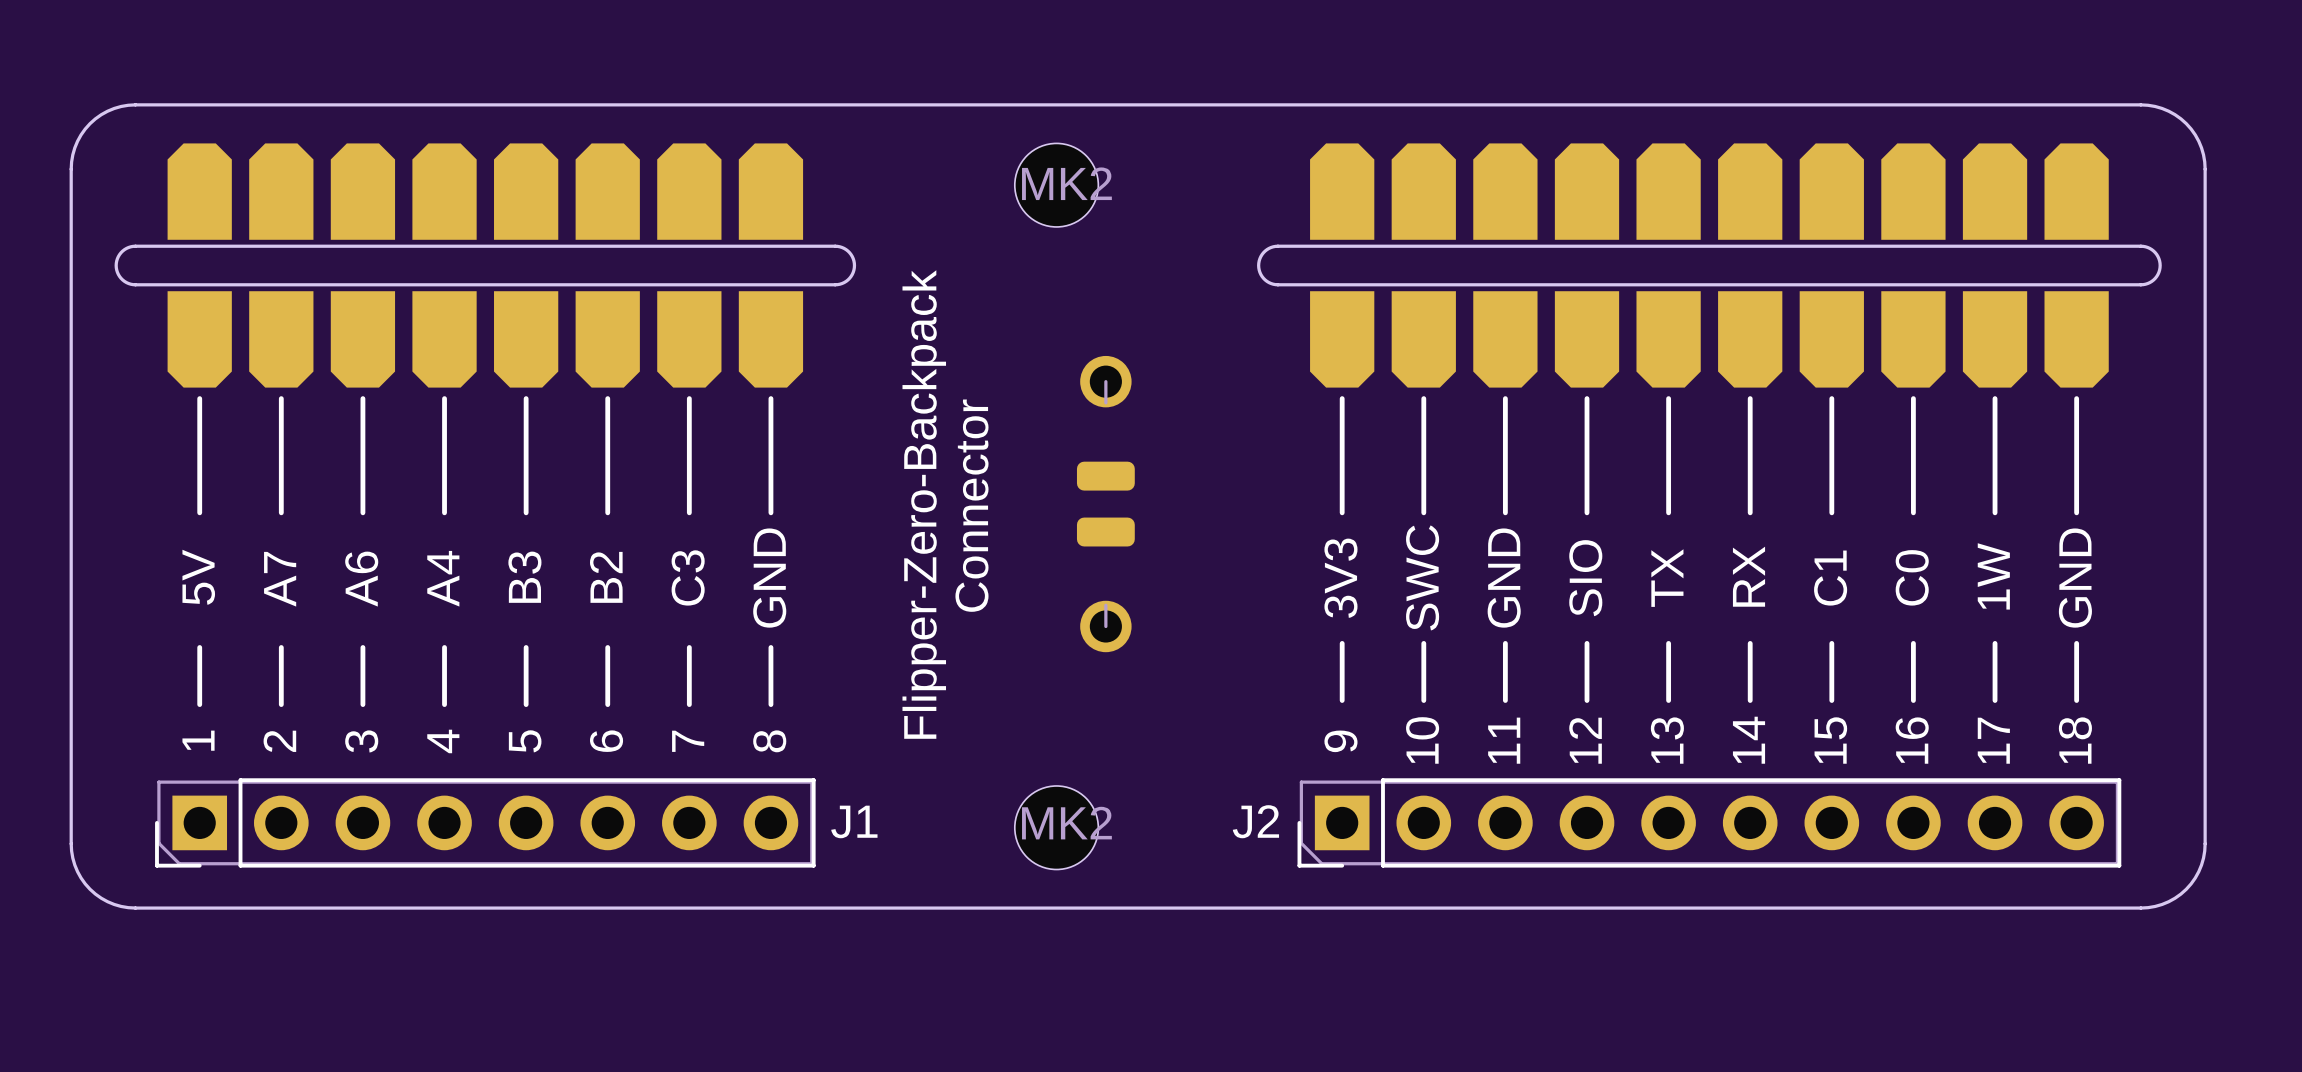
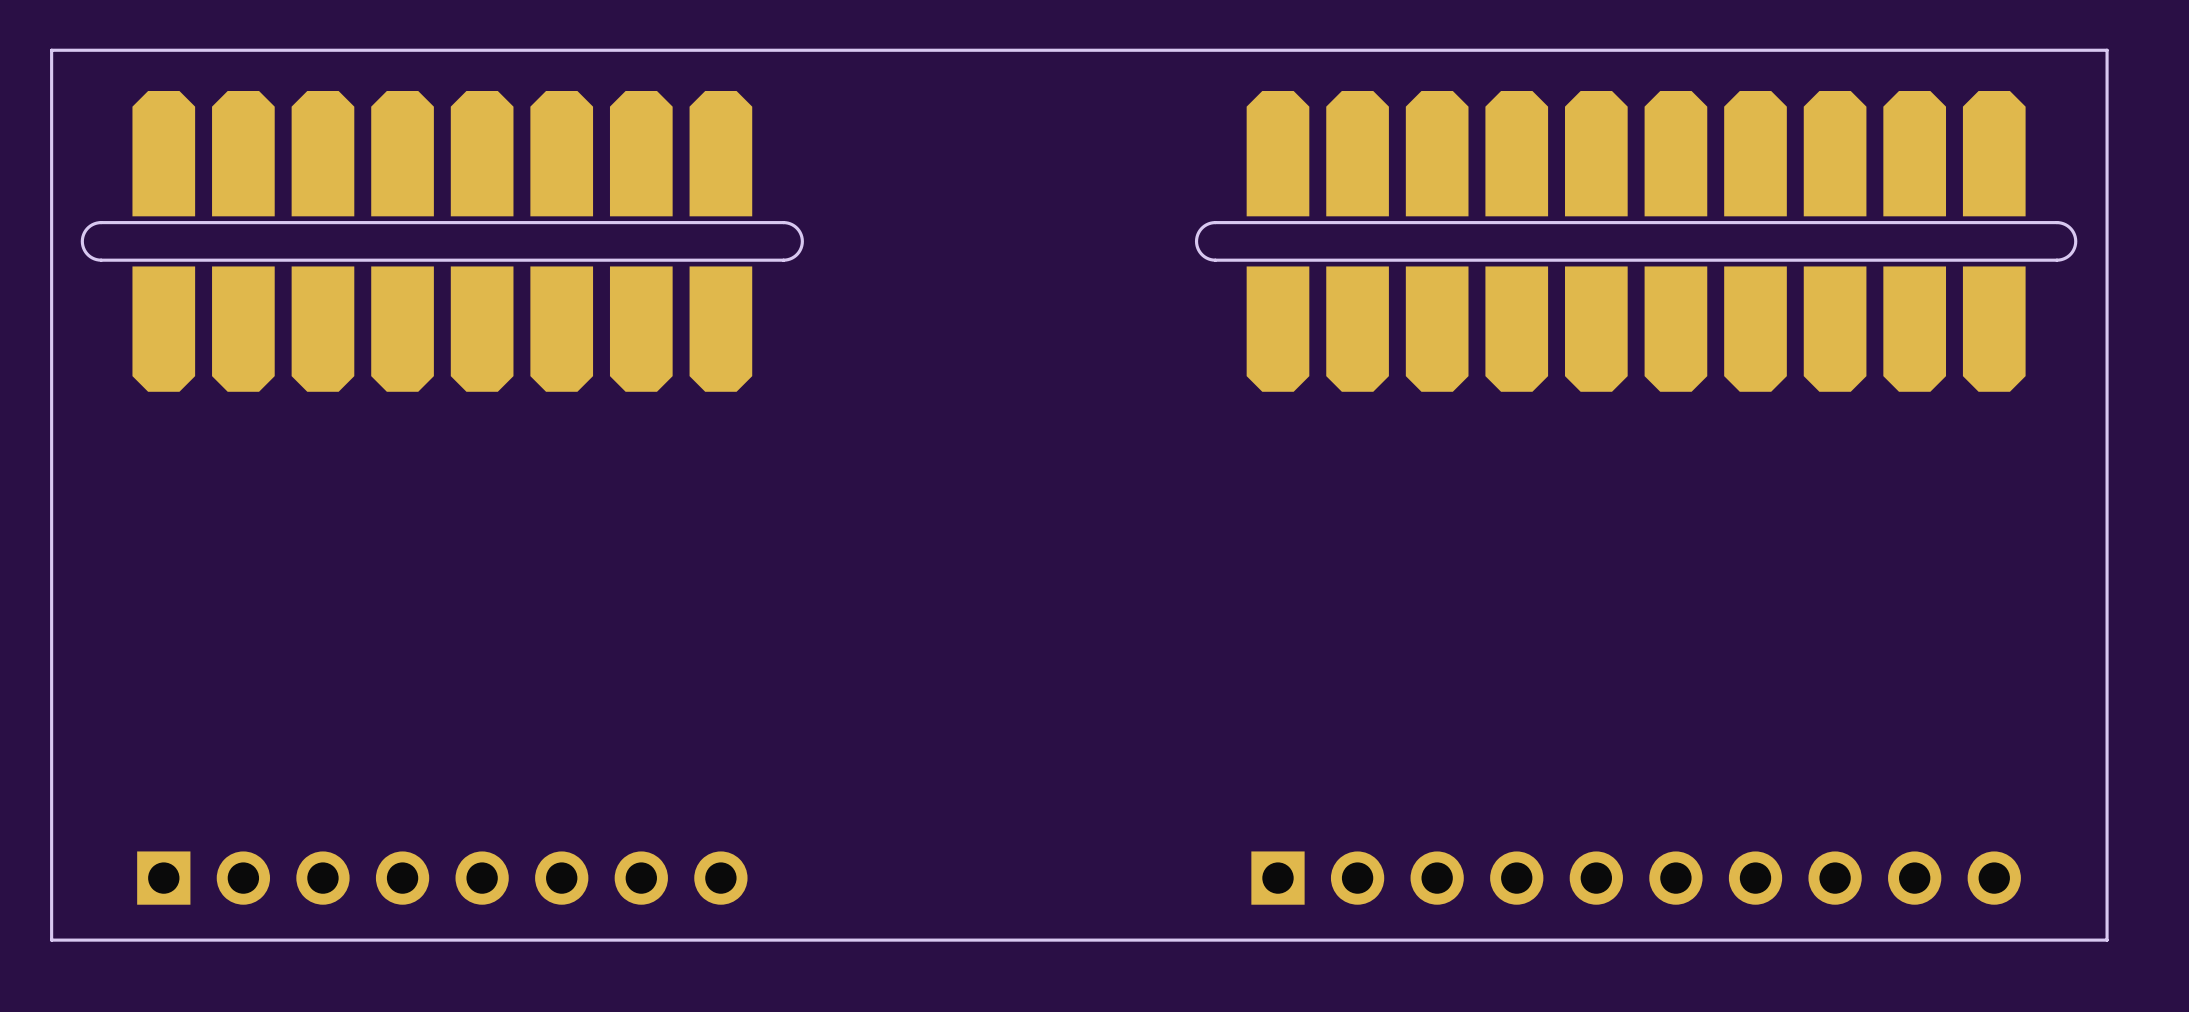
board edge: (135, 104) (2140, 104) (2162, 108) (2180, 118) (2191, 129) (2201, 147) (2205, 169) (2205, 843) (2201, 865) (2191, 883) (2180, 894) (2162, 904) (2140, 908) (135, 908) (114, 904) (95, 894) (85, 883) (74, 865) (71, 851) (71, 169) (74, 147) (81, 134) (90, 123) (101, 114) (114, 108) (135, 104) -> (51, 50) (51, 940) (2107, 940) (2107, 50) (51, 50)
part footprint: [167, 143, 232, 388] -> [132, 90, 196, 392]
part footprint: [249, 143, 314, 388] -> [212, 90, 275, 392]
part footprint: [330, 143, 396, 388] -> [291, 90, 355, 392]
part footprint: [412, 143, 477, 388] -> [371, 90, 434, 392]
part footprint: [494, 143, 559, 388] -> [450, 90, 514, 392]
part footprint: [575, 143, 640, 388] -> [530, 90, 594, 392]
part footprint: [657, 143, 722, 388] -> [609, 90, 673, 392]
part footprint: [738, 143, 804, 388] -> [689, 90, 753, 392]
part footprint: [1310, 143, 1375, 388] -> [1246, 90, 1310, 392]
part footprint: [1391, 143, 1456, 388] -> [1326, 90, 1389, 392]
part footprint: [1473, 143, 1538, 388] -> [1405, 90, 1469, 392]
part footprint: [1554, 143, 1620, 388] -> [1485, 90, 1549, 392]
part footprint: [1636, 143, 1701, 388] -> [1565, 90, 1628, 392]
part footprint: [1718, 143, 1783, 388] -> [1644, 90, 1708, 392]
part footprint: [1799, 143, 1864, 388] -> [1724, 90, 1787, 392]
part footprint: [1881, 143, 1946, 388] -> [1803, 90, 1867, 392]
part footprint: [1962, 143, 2028, 388] -> [1883, 90, 1947, 392]
part footprint: [2044, 143, 2109, 388] -> [1962, 90, 2026, 392]
MK2: (1056, 185) -> none
line: (199, 398) (199, 512) -> none
line: (281, 398) (281, 512) -> none
line: (362, 398) (362, 512) -> none
line: (444, 398) (444, 512) -> none
line: (526, 398) (526, 512) -> none
line: (607, 398) (607, 512) -> none
line: (689, 398) (689, 512) -> none
line: (770, 398) (770, 512) -> none
line: (1342, 398) (1342, 512) -> none
line: (1423, 398) (1423, 512) -> none
line: (1505, 398) (1505, 512) -> none
line: (1587, 398) (1587, 512) -> none
line: (1668, 398) (1668, 512) -> none
line: (1750, 398) (1750, 512) -> none
line: (1831, 398) (1831, 512) -> none
line: (1913, 398) (1913, 512) -> none
line: (1995, 398) (1995, 512) -> none
line: (2076, 398) (2076, 512) -> none
text: Flipper-Zero-Backpack (924, 504) -> none
part: (1105, 504) -> none
text: Connector (971, 505) -> none
text: RX (1749, 576) -> none
text: 1W (1993, 576) -> none
text: 5V (198, 577) -> none
text: B3 (524, 577) -> none
text: B2 (606, 577) -> none
text: C3 (688, 577) -> none
text: SWC (1422, 577) -> none
text: C0 (1912, 577) -> none
text: A4 (443, 578) -> none
text: GND (769, 578) -> none
text: 3V3 (1340, 578) -> none
text: GND (1504, 578) -> none
text: SIO (1585, 578) -> none
text: TX (1667, 578) -> none
text: C1 (1830, 578) -> none
text: GND (2075, 578) -> none
text: A7 (280, 579) -> none
text: A6 (361, 579) -> none
line: (1342, 643) (1342, 700) -> none
line: (1423, 643) (1423, 700) -> none
line: (1505, 643) (1505, 700) -> none
line: (1587, 643) (1587, 700) -> none
line: (1668, 643) (1668, 700) -> none
line: (1750, 643) (1750, 700) -> none
line: (1831, 643) (1831, 700) -> none
line: (1913, 643) (1913, 700) -> none
line: (1995, 643) (1995, 700) -> none
line: (2076, 643) (2076, 700) -> none
line: (199, 647) (199, 704) -> none
line: (281, 647) (281, 704) -> none
line: (362, 647) (362, 704) -> none
line: (444, 647) (444, 704) -> none
line: (526, 647) (526, 704) -> none
line: (607, 647) (607, 704) -> none
line: (689, 647) (689, 704) -> none
line: (770, 647) (770, 704) -> none
text: 1 (198, 740) -> none
text: 10 (1422, 740) -> none
text: 11 (1504, 740) -> none
text: 12 (1585, 740) -> none
text: 13 (1667, 740) -> none
text: 14 (1749, 740) -> none
text: 15 (1830, 740) -> none
text: 16 (1912, 740) -> none
text: 17 (1993, 740) -> none
text: 18 (2075, 740) -> none
text: 2 (279, 741) -> none
text: 3 (361, 741) -> none
text: 4 (443, 741) -> none
text: 5 (525, 741) -> none
text: 6 (606, 741) -> none
text: 7 (688, 741) -> none
text: 8 (769, 741) -> none
text: 9 (1340, 741) -> none
J1 side: top (485, 822) -> bottom (442, 878)
J2 side: top (1709, 822) -> bottom (1636, 878)
MK2: (1056, 827) -> none

